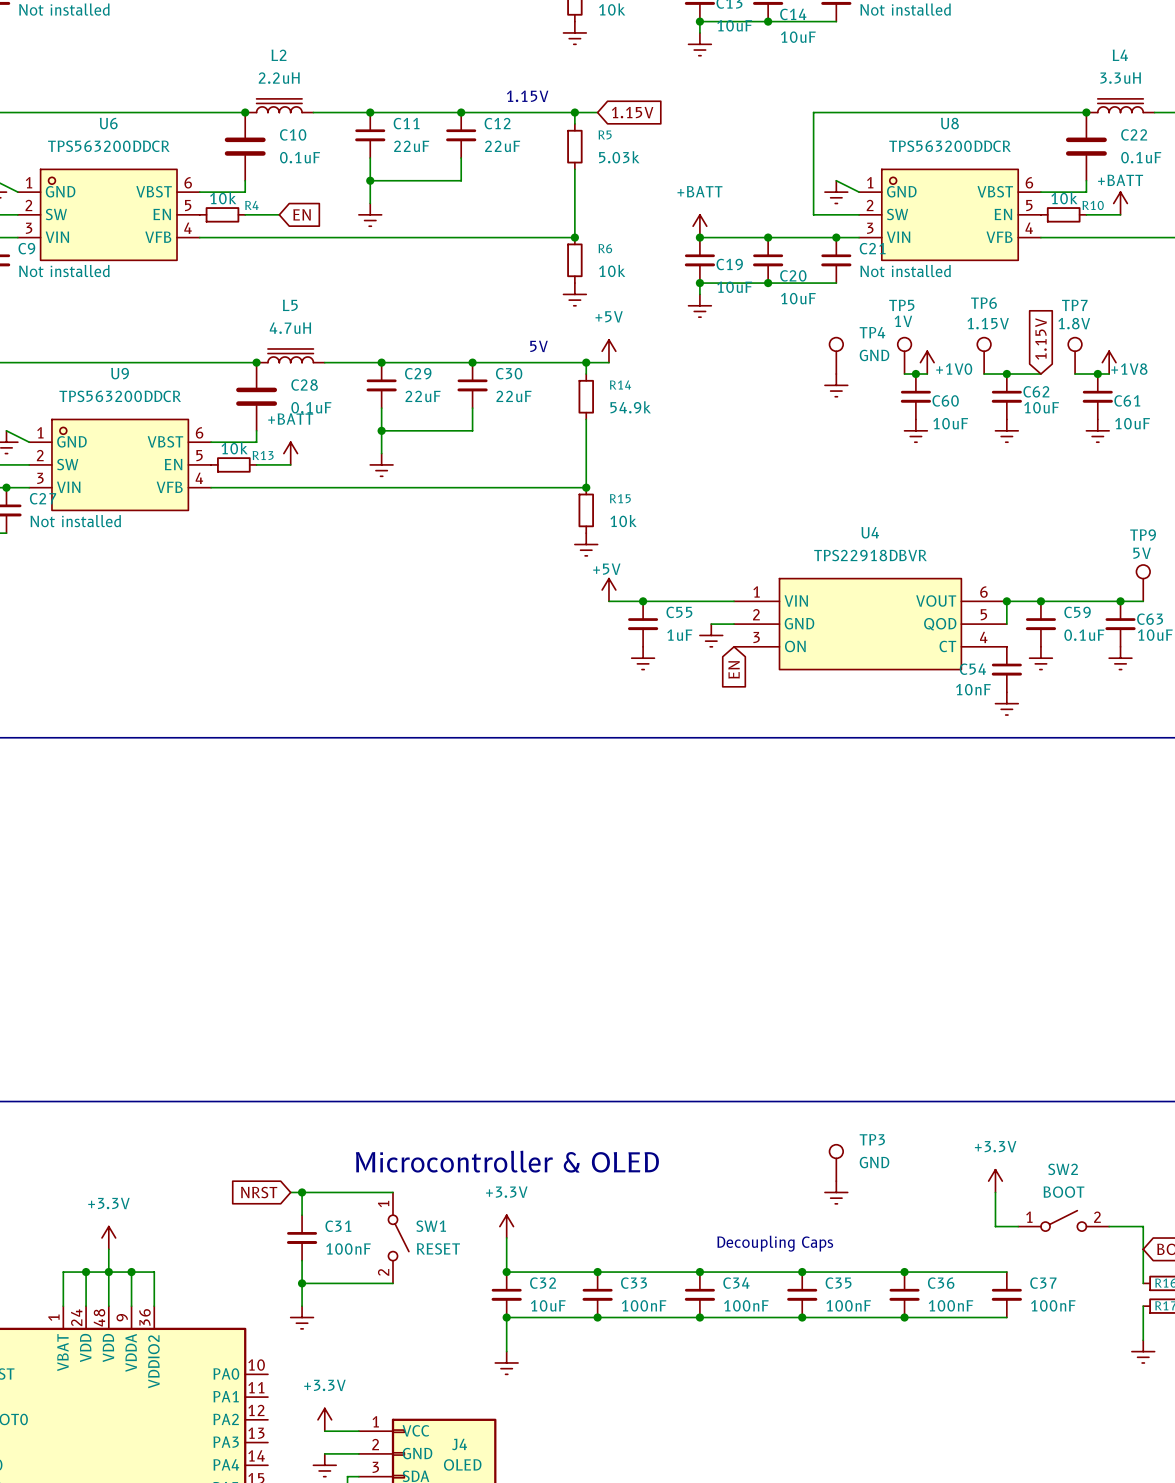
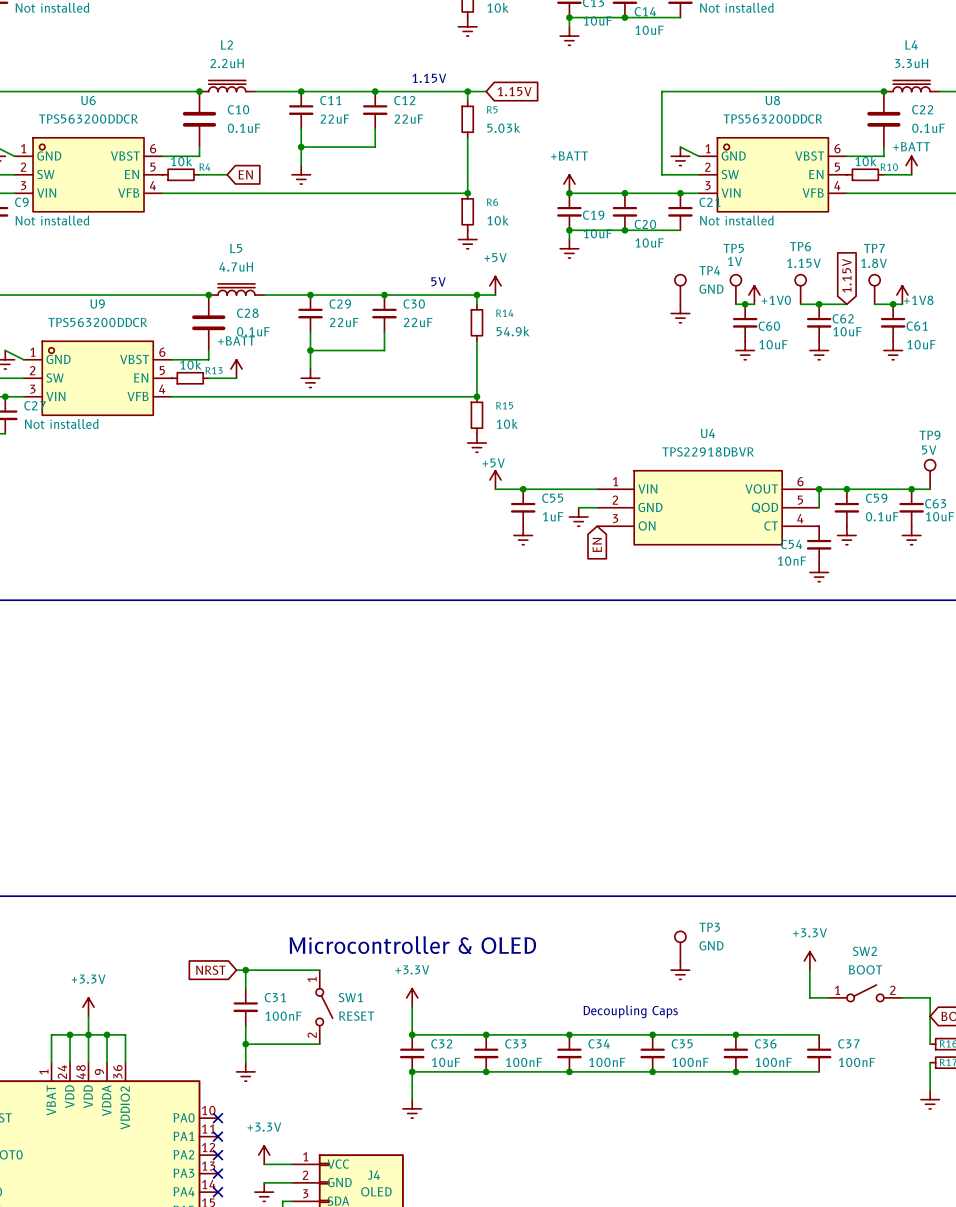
no-connect mark: none -> (218, 1118)
no-connect mark: none -> (218, 1136)
no-connect mark: none -> (218, 1155)
no-connect mark: none -> (218, 1173)
no-connect mark: none -> (218, 1192)

